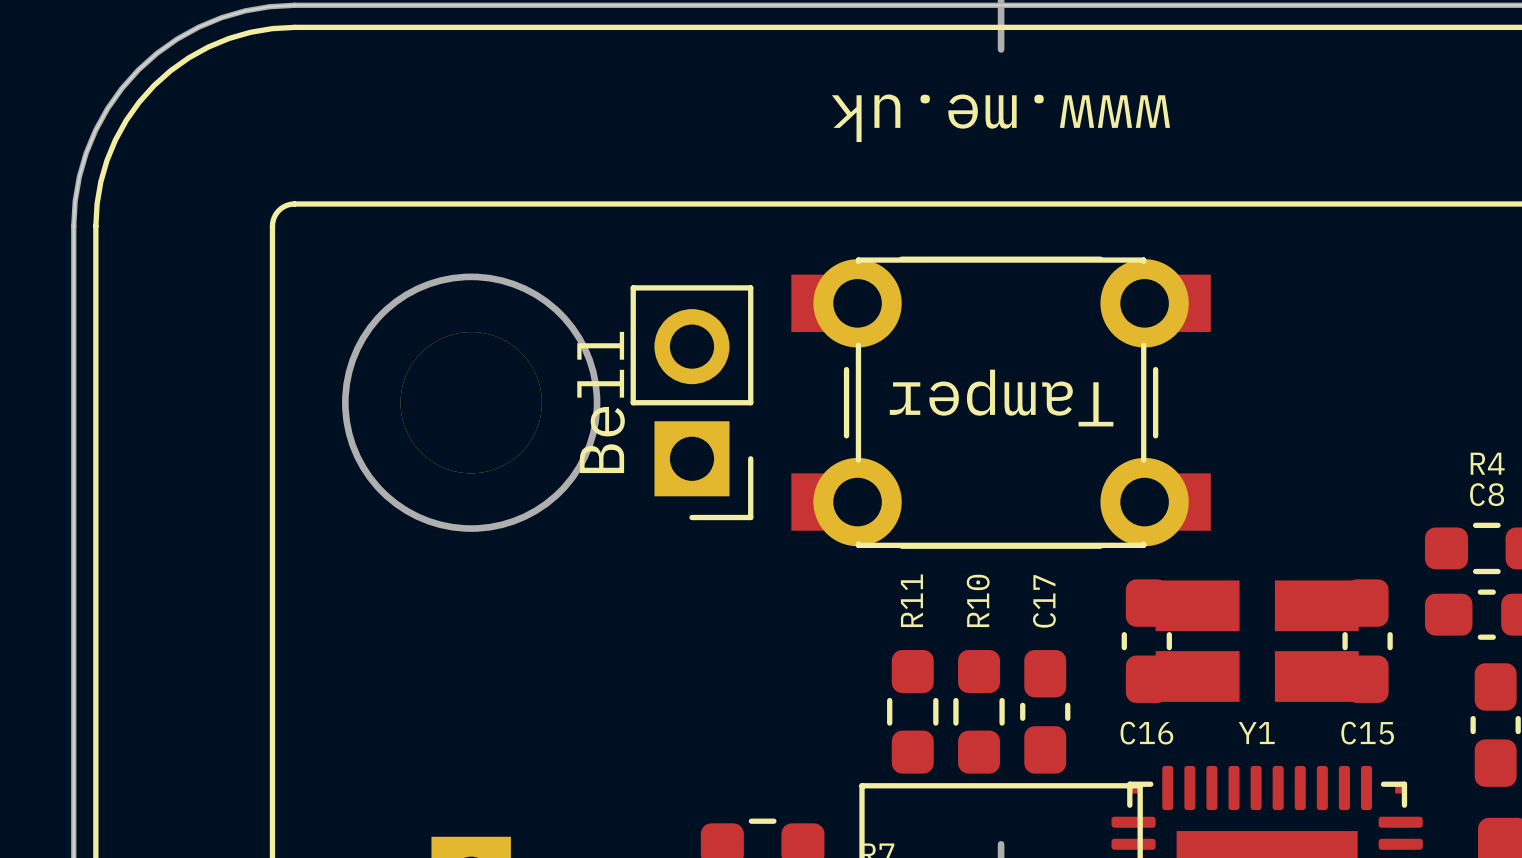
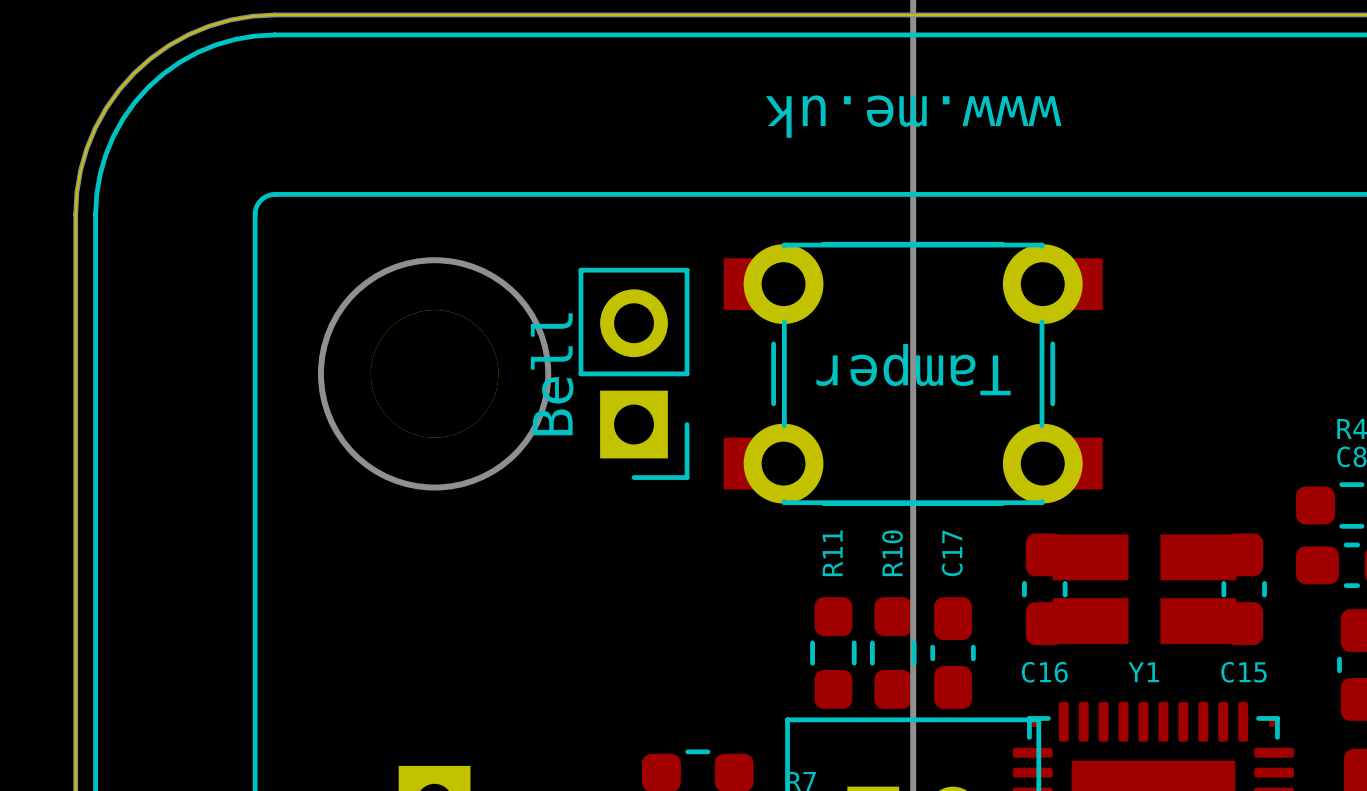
line: none -> (913, 54) (913, 772)

